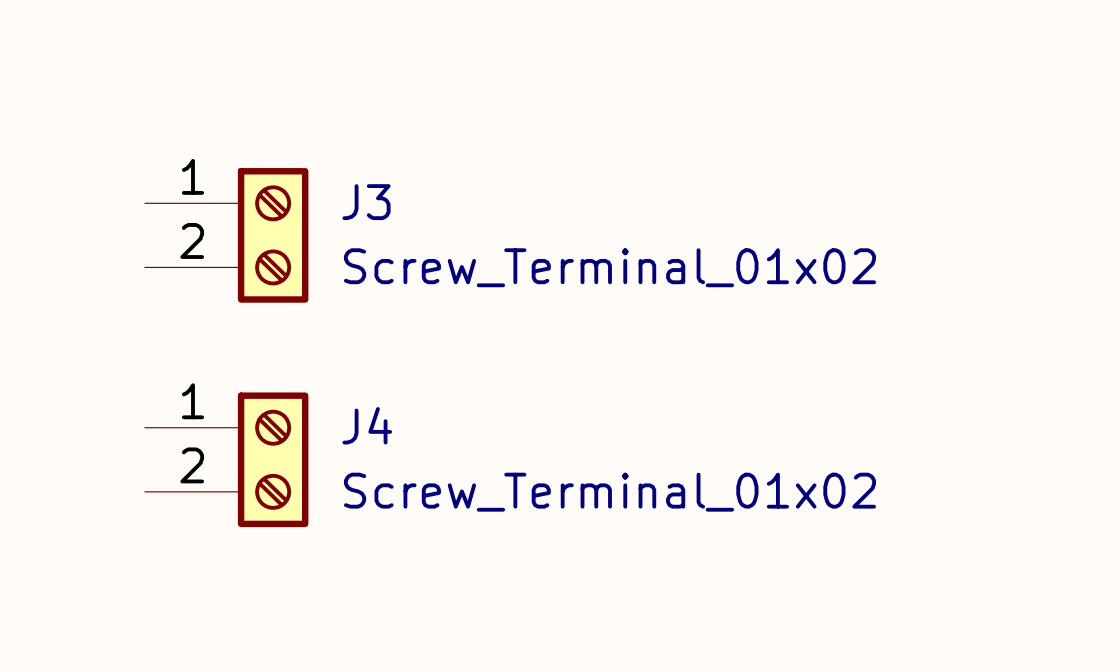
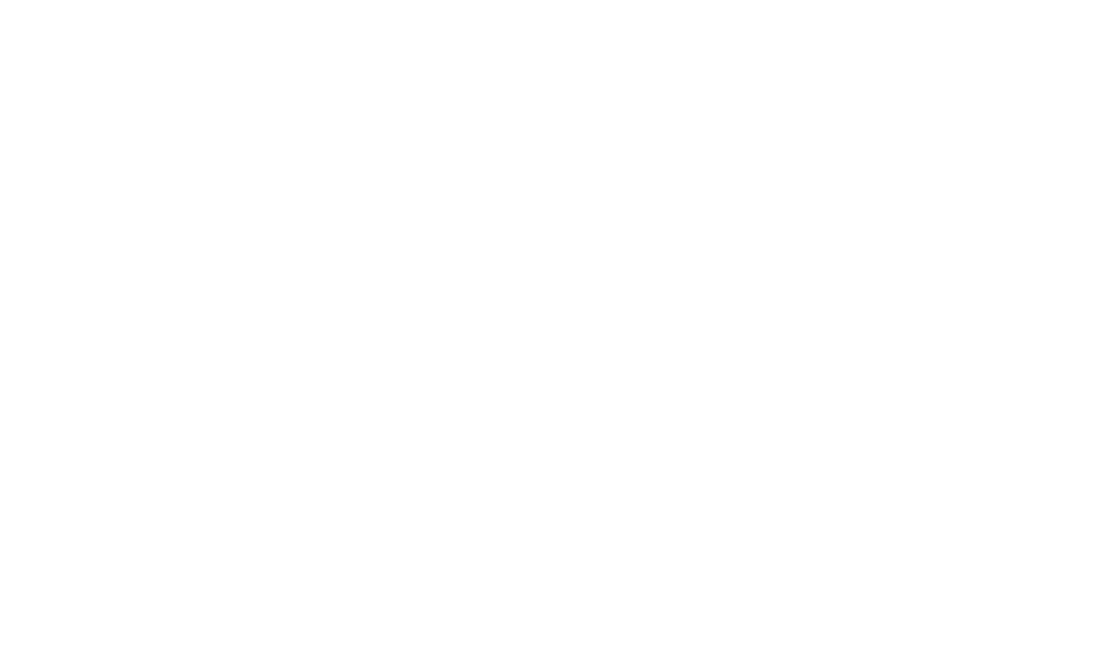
J3: Screw_Terminal_01x02 (226, 235) -> none
J4: Screw_Terminal_01x02 (226, 459) -> none

